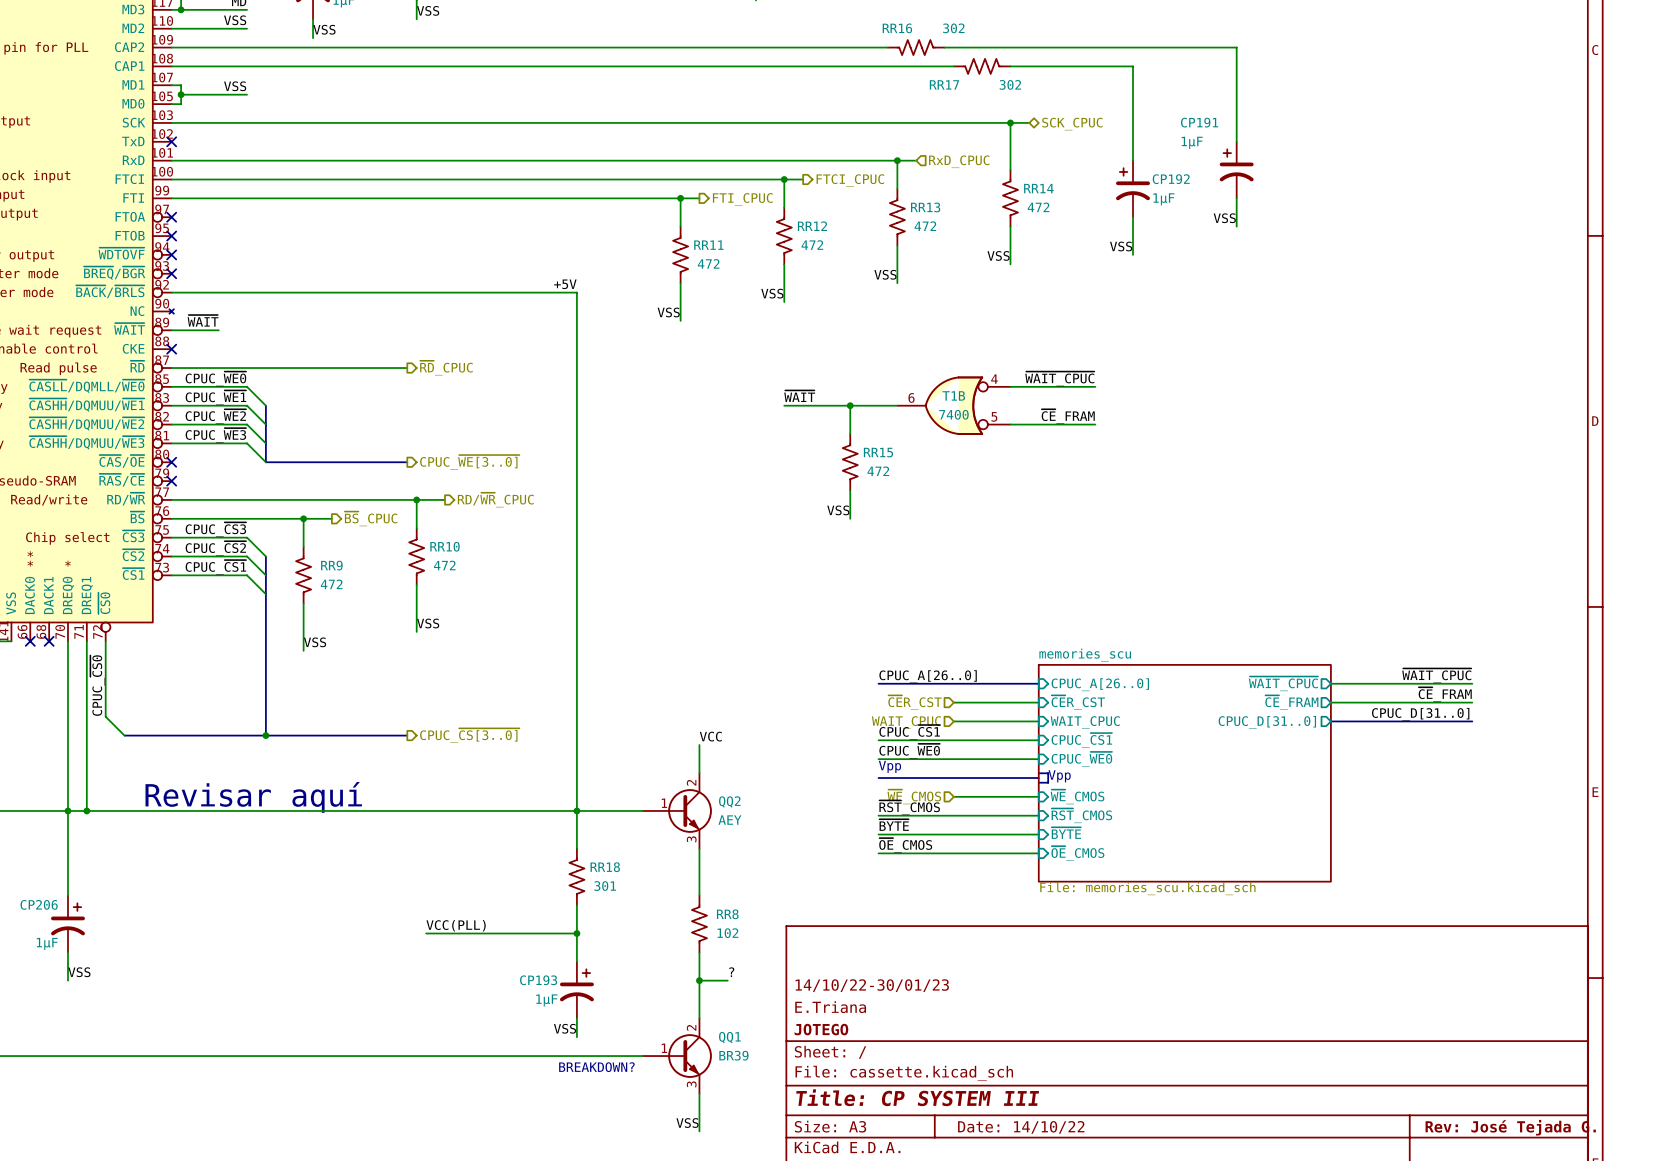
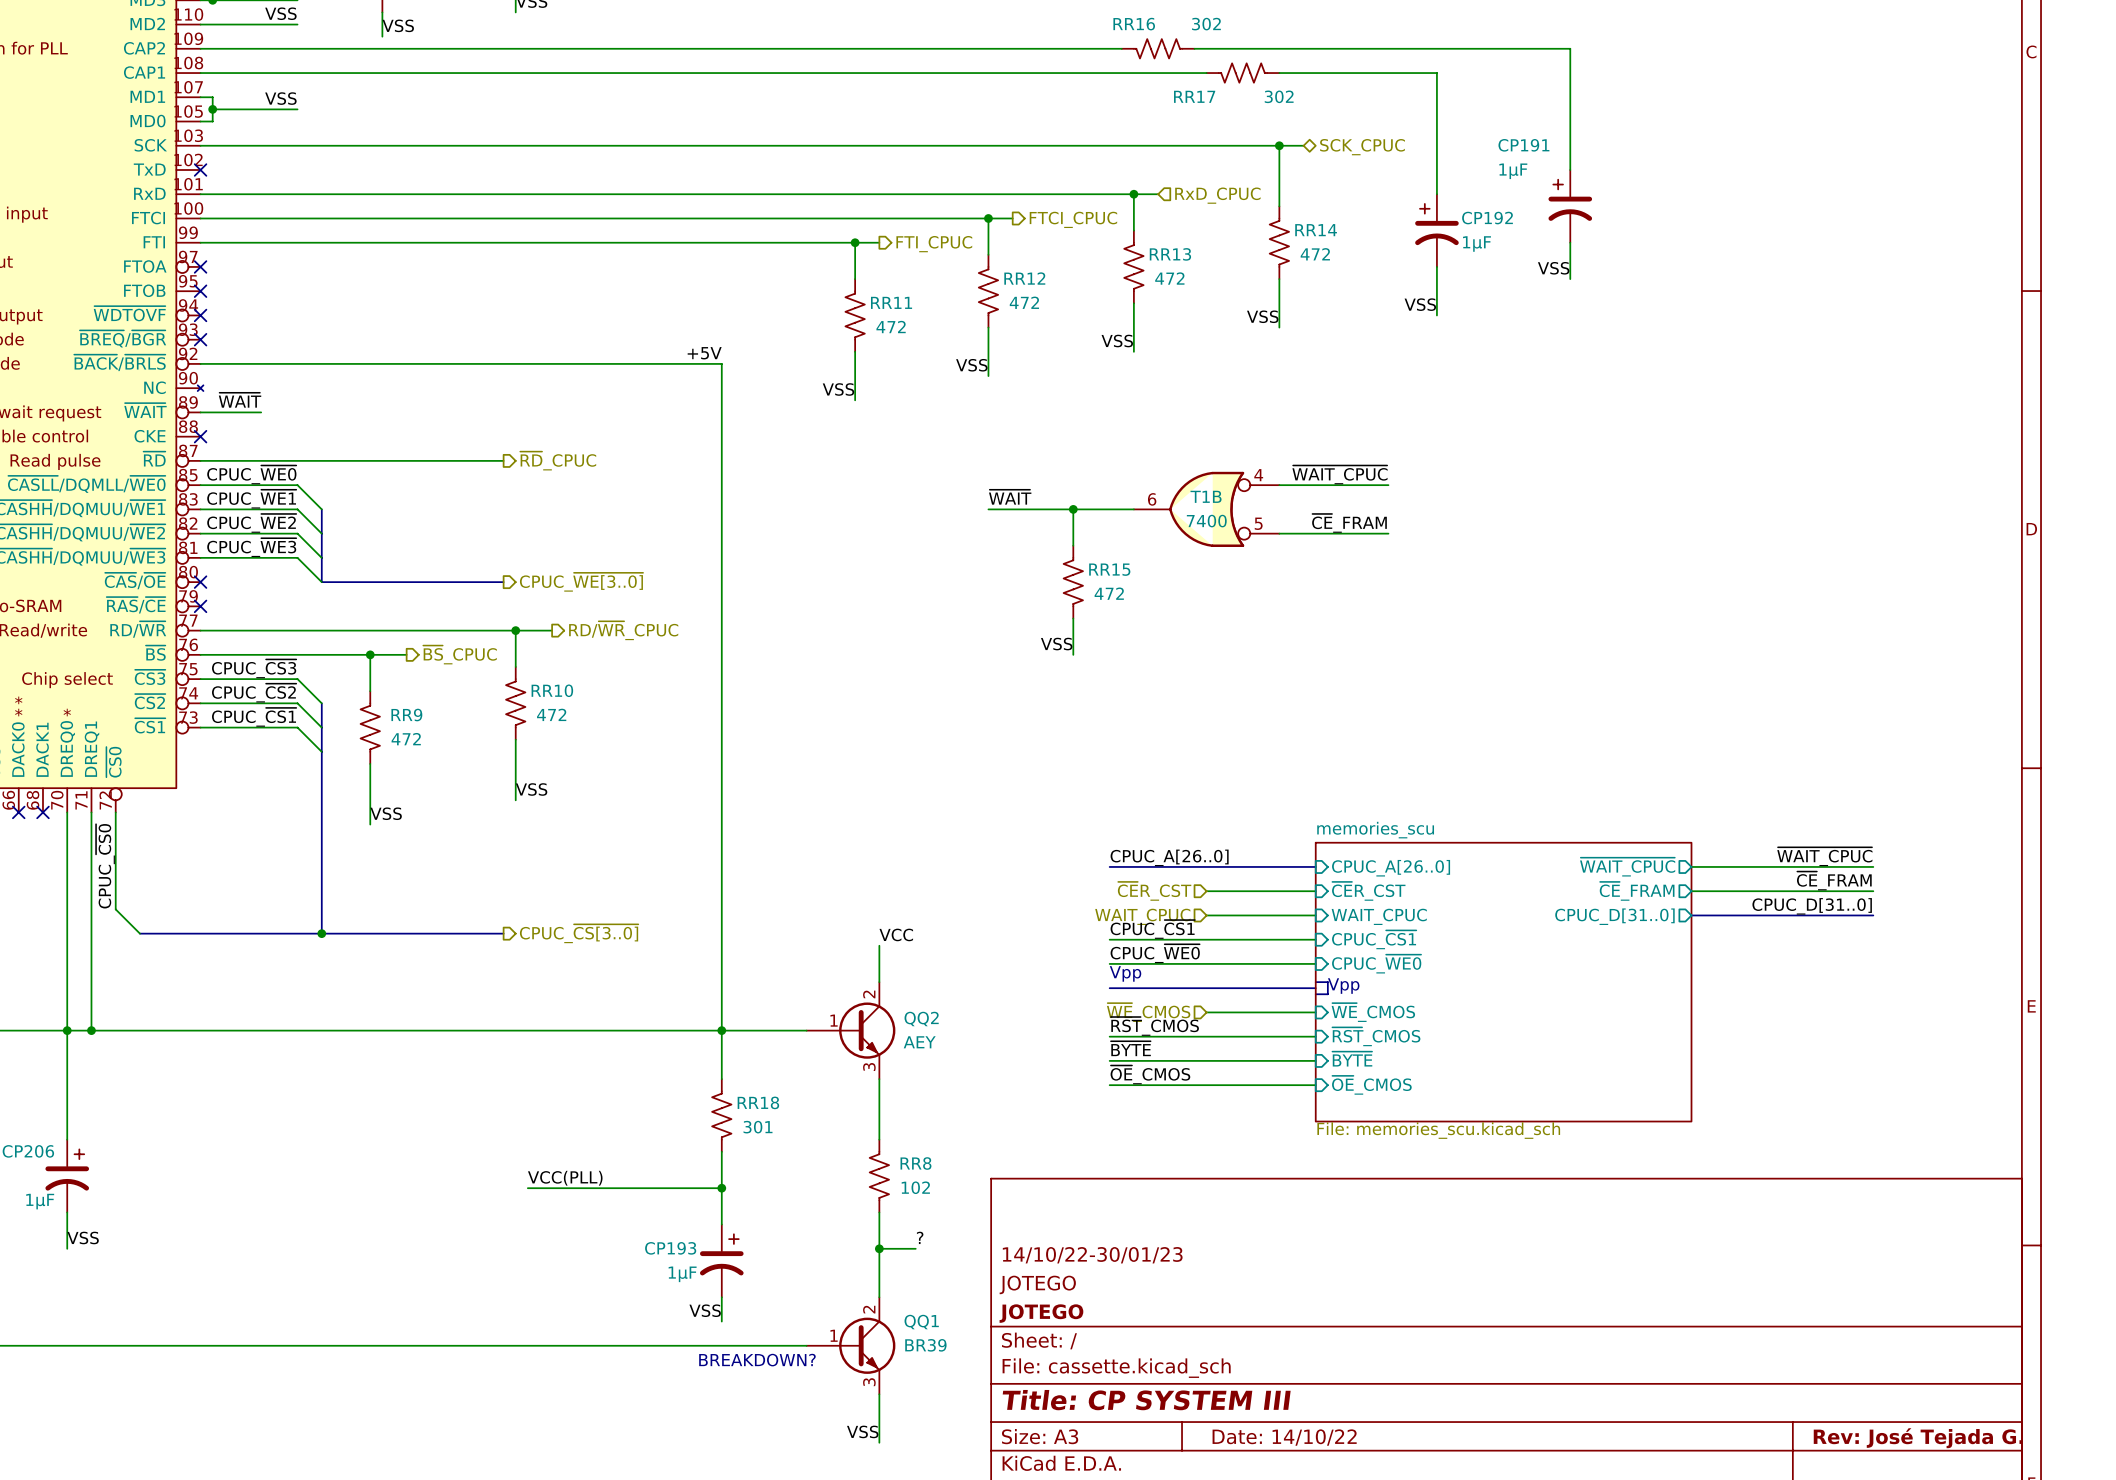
text: Revisar aquí (253, 797) -> none
title block: E.Triana (830, 1007) -> JOTEGO (1037, 1284)

